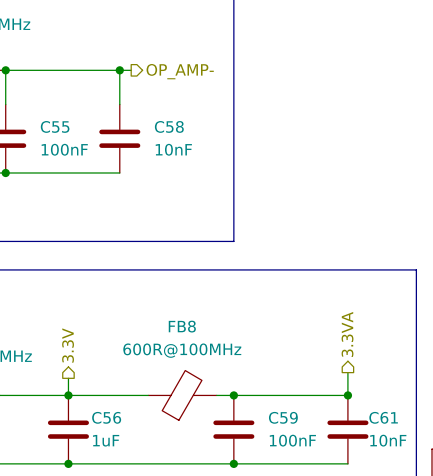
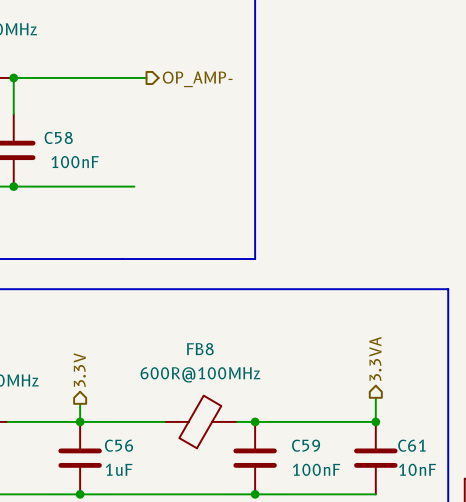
wire: (119, 70) (119, 104) -> none
junction: (119, 70) -> none
C55 name: C55 (55, 126) -> C58 (58, 137)
C58: 10nF (119, 138) -> none

